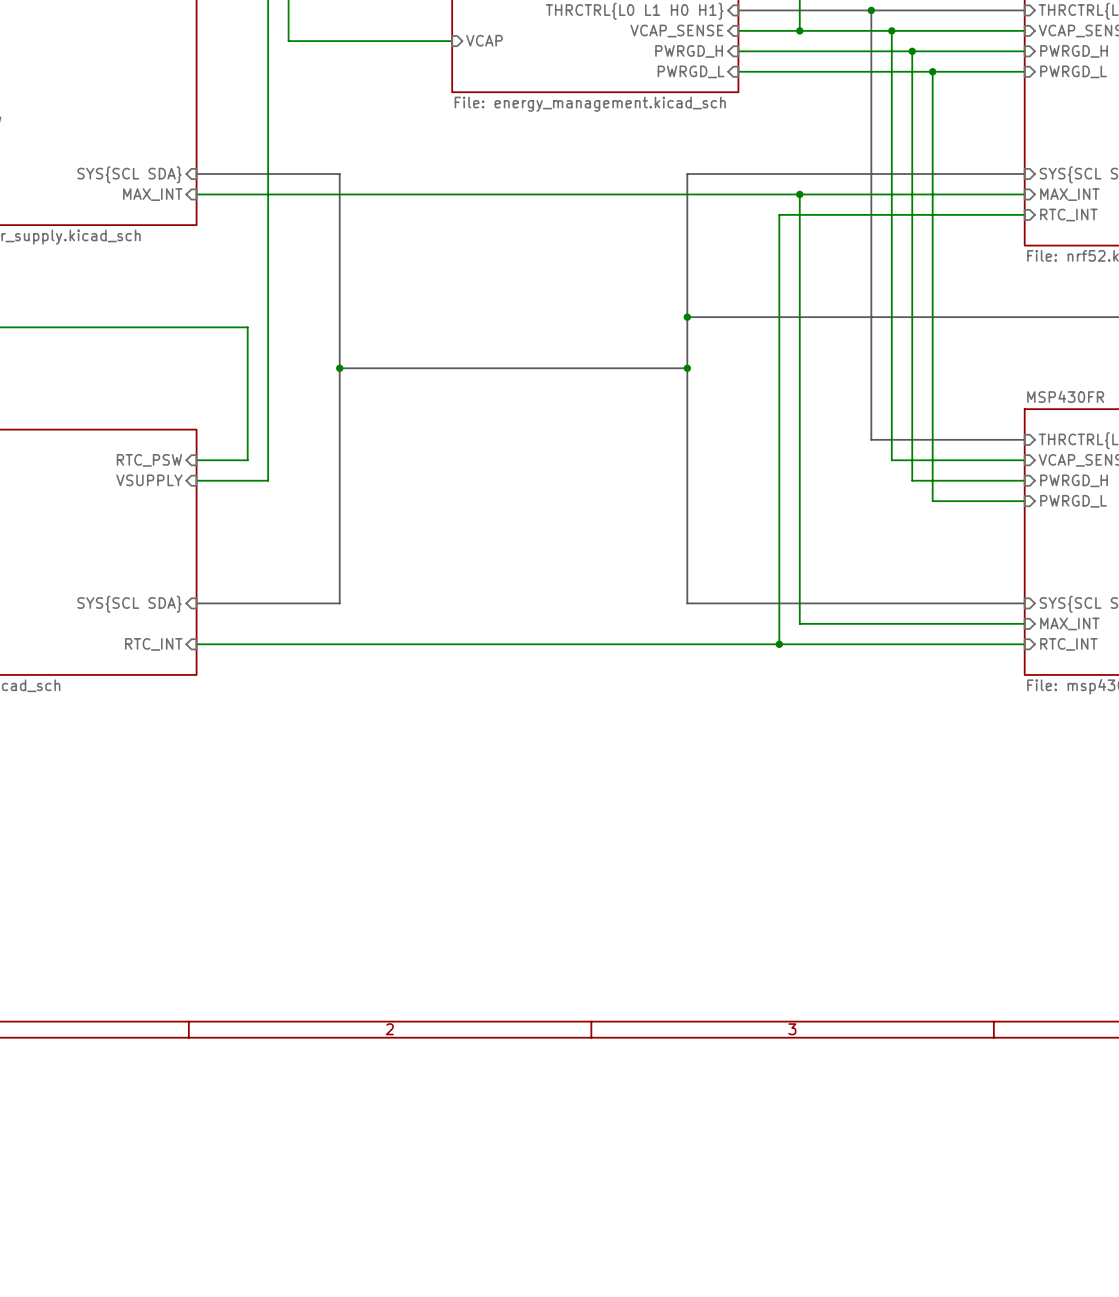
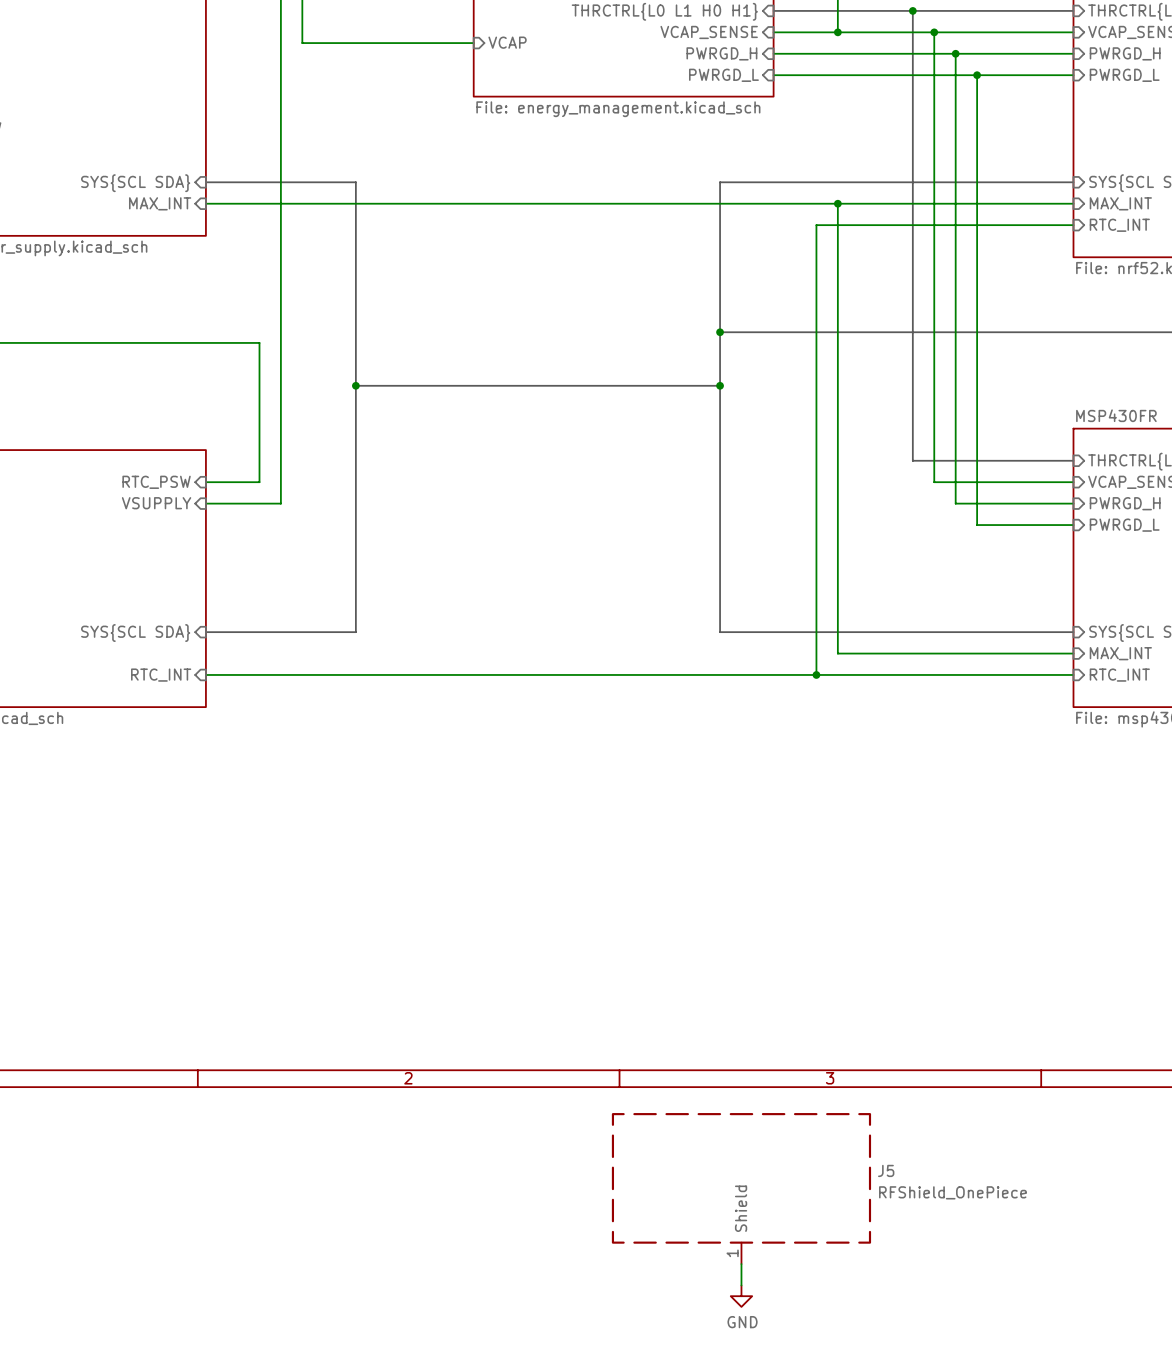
J5: none -> RFShield_OnePiece (741, 1188)
wire: none -> (741, 1264) (741, 1285)
power symbol: none -> GND (741, 1296)

